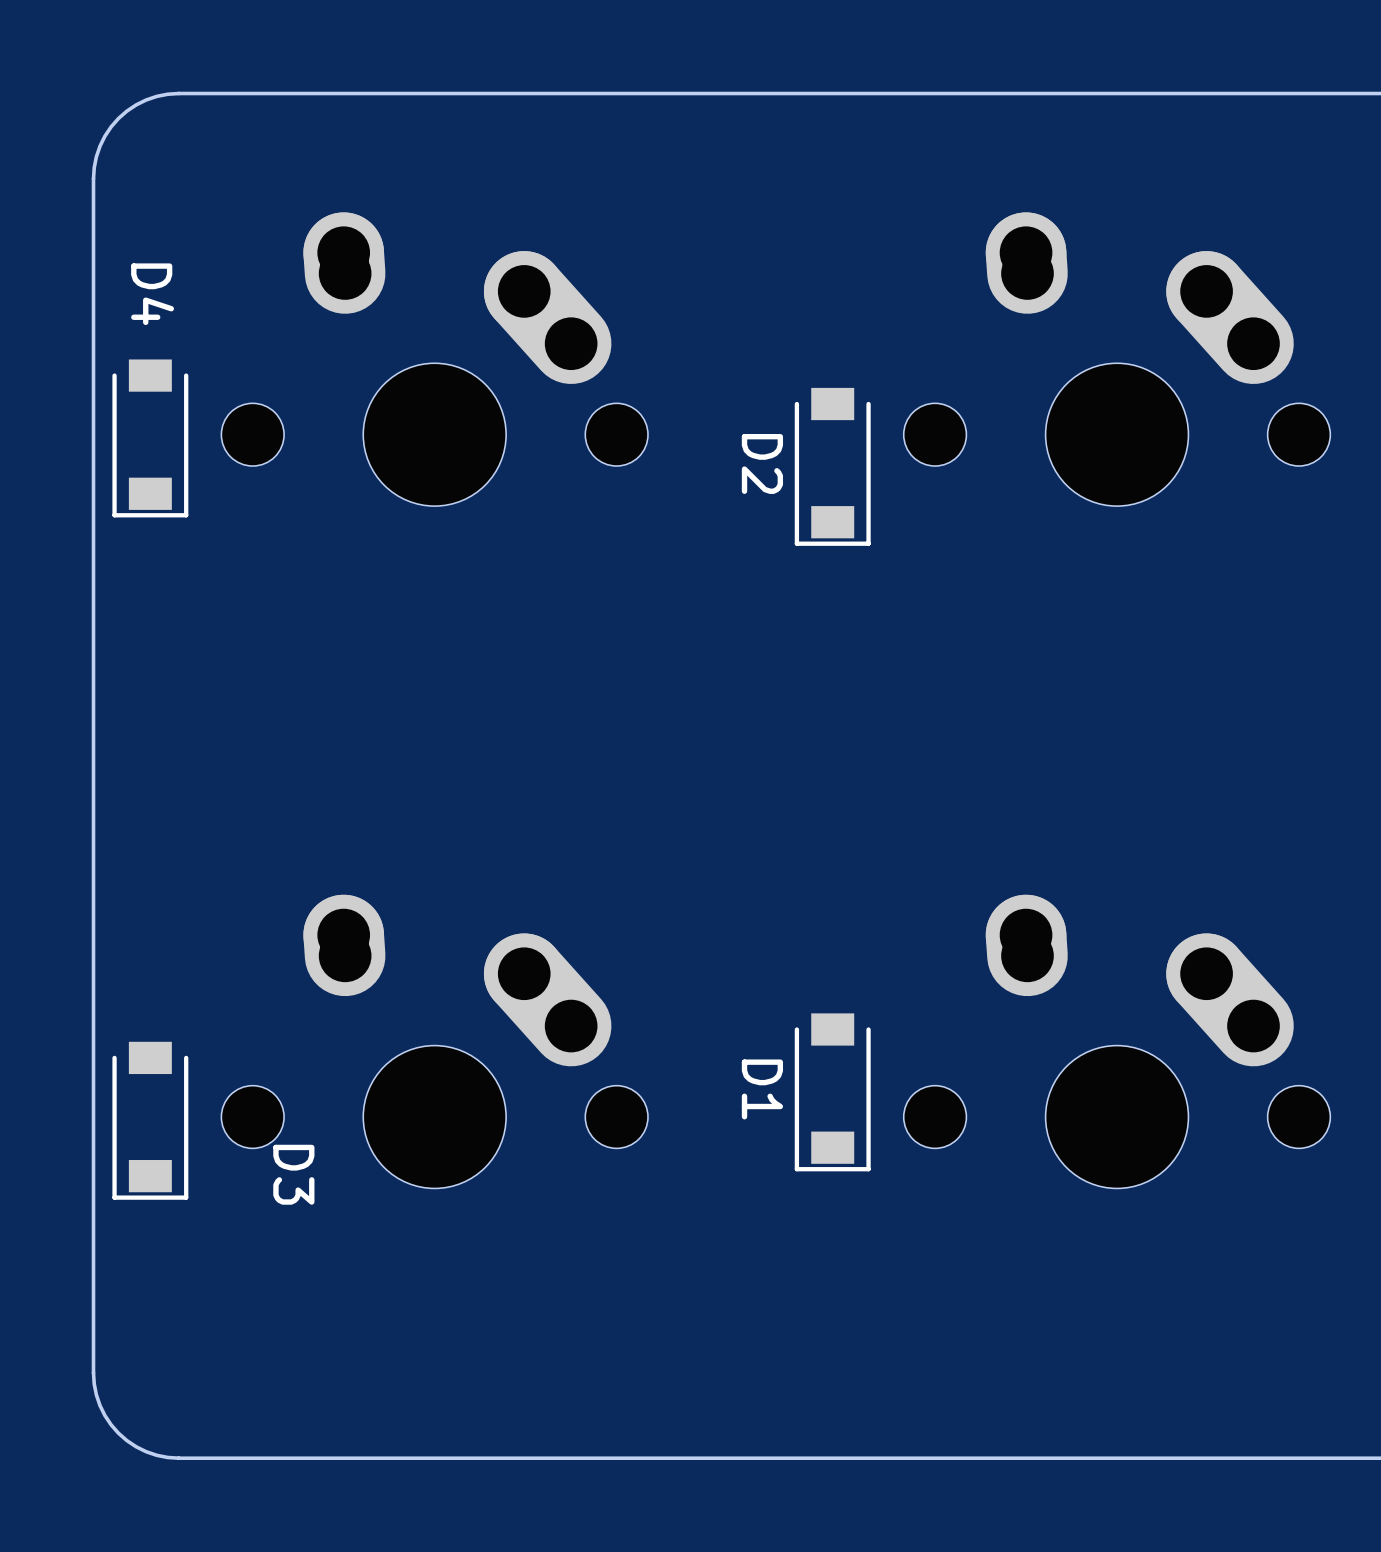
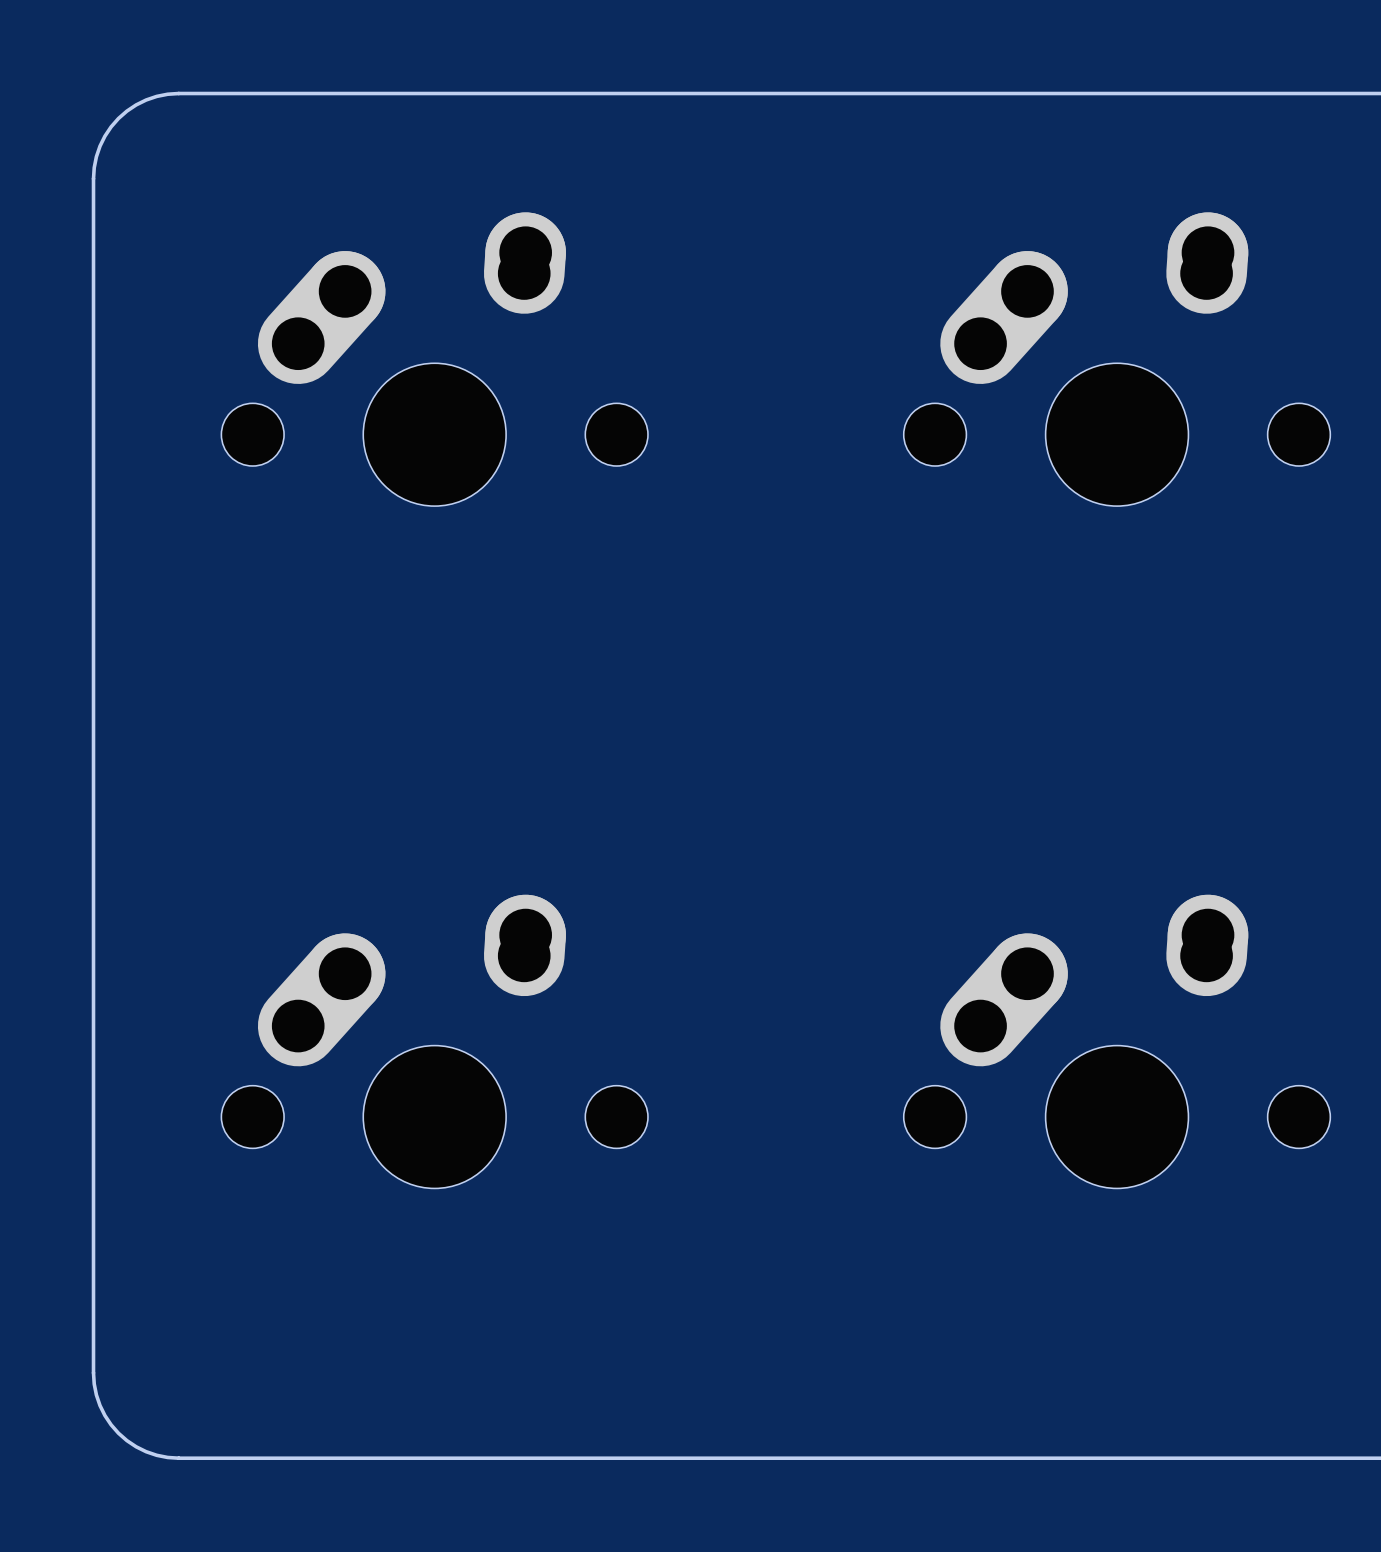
part side: top (434, 359) -> bottom (434, 359)
part side: top (1117, 359) -> bottom (1117, 359)
D4: (150, 438) -> none
D2: (832, 466) -> none
part side: top (434, 1041) -> bottom (434, 1041)
part side: top (1117, 1041) -> bottom (1117, 1041)
D1: (832, 1092) -> none
D3: (150, 1120) -> none

